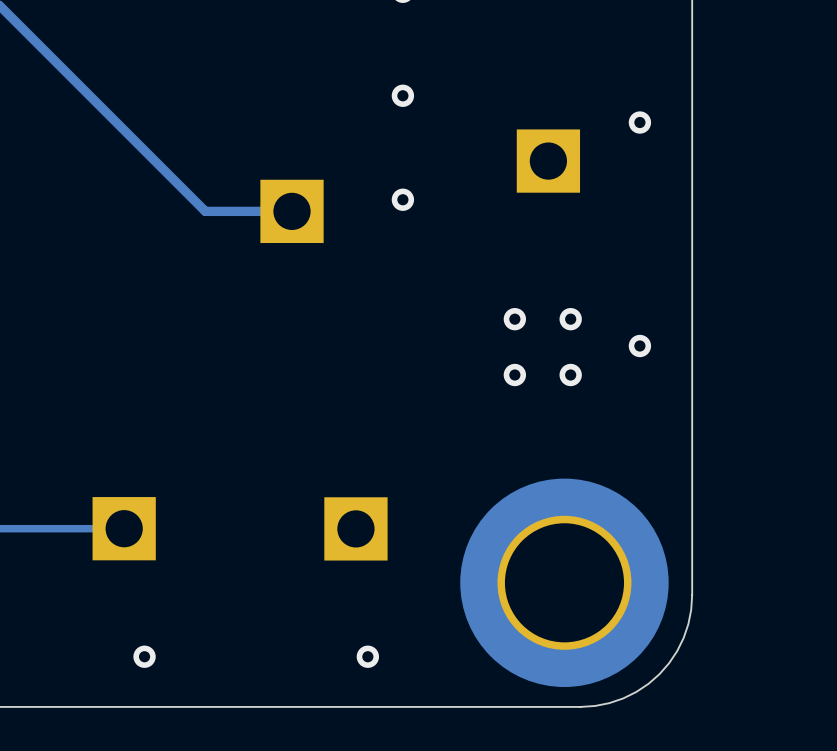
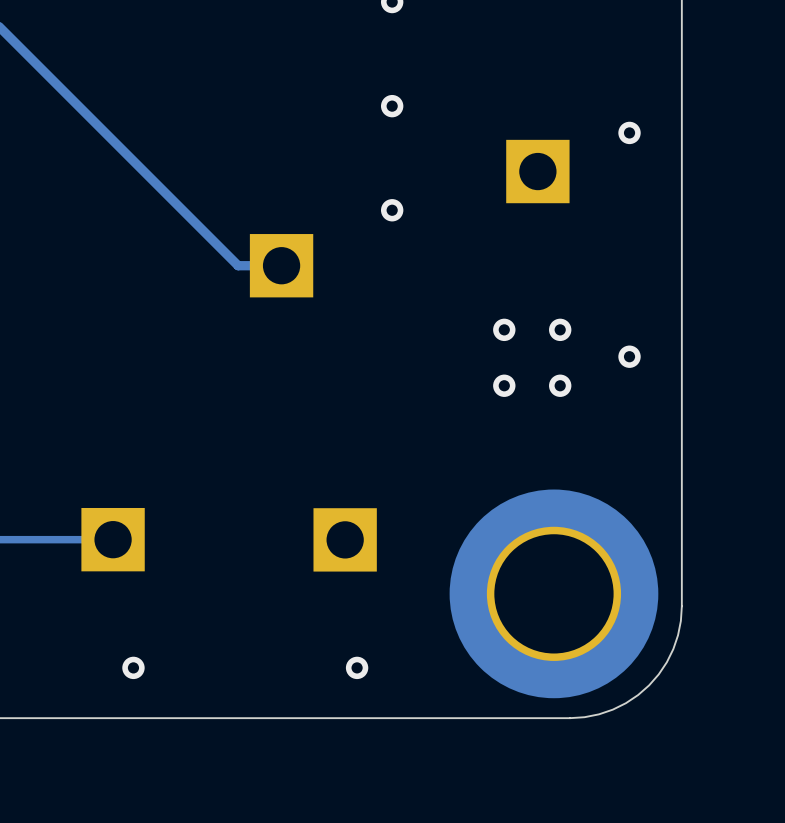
track: (292, 211) (205, 211) -> (281, 265) (238, 265) (194, 221)
part position: (292, 211) -> (281, 265)

